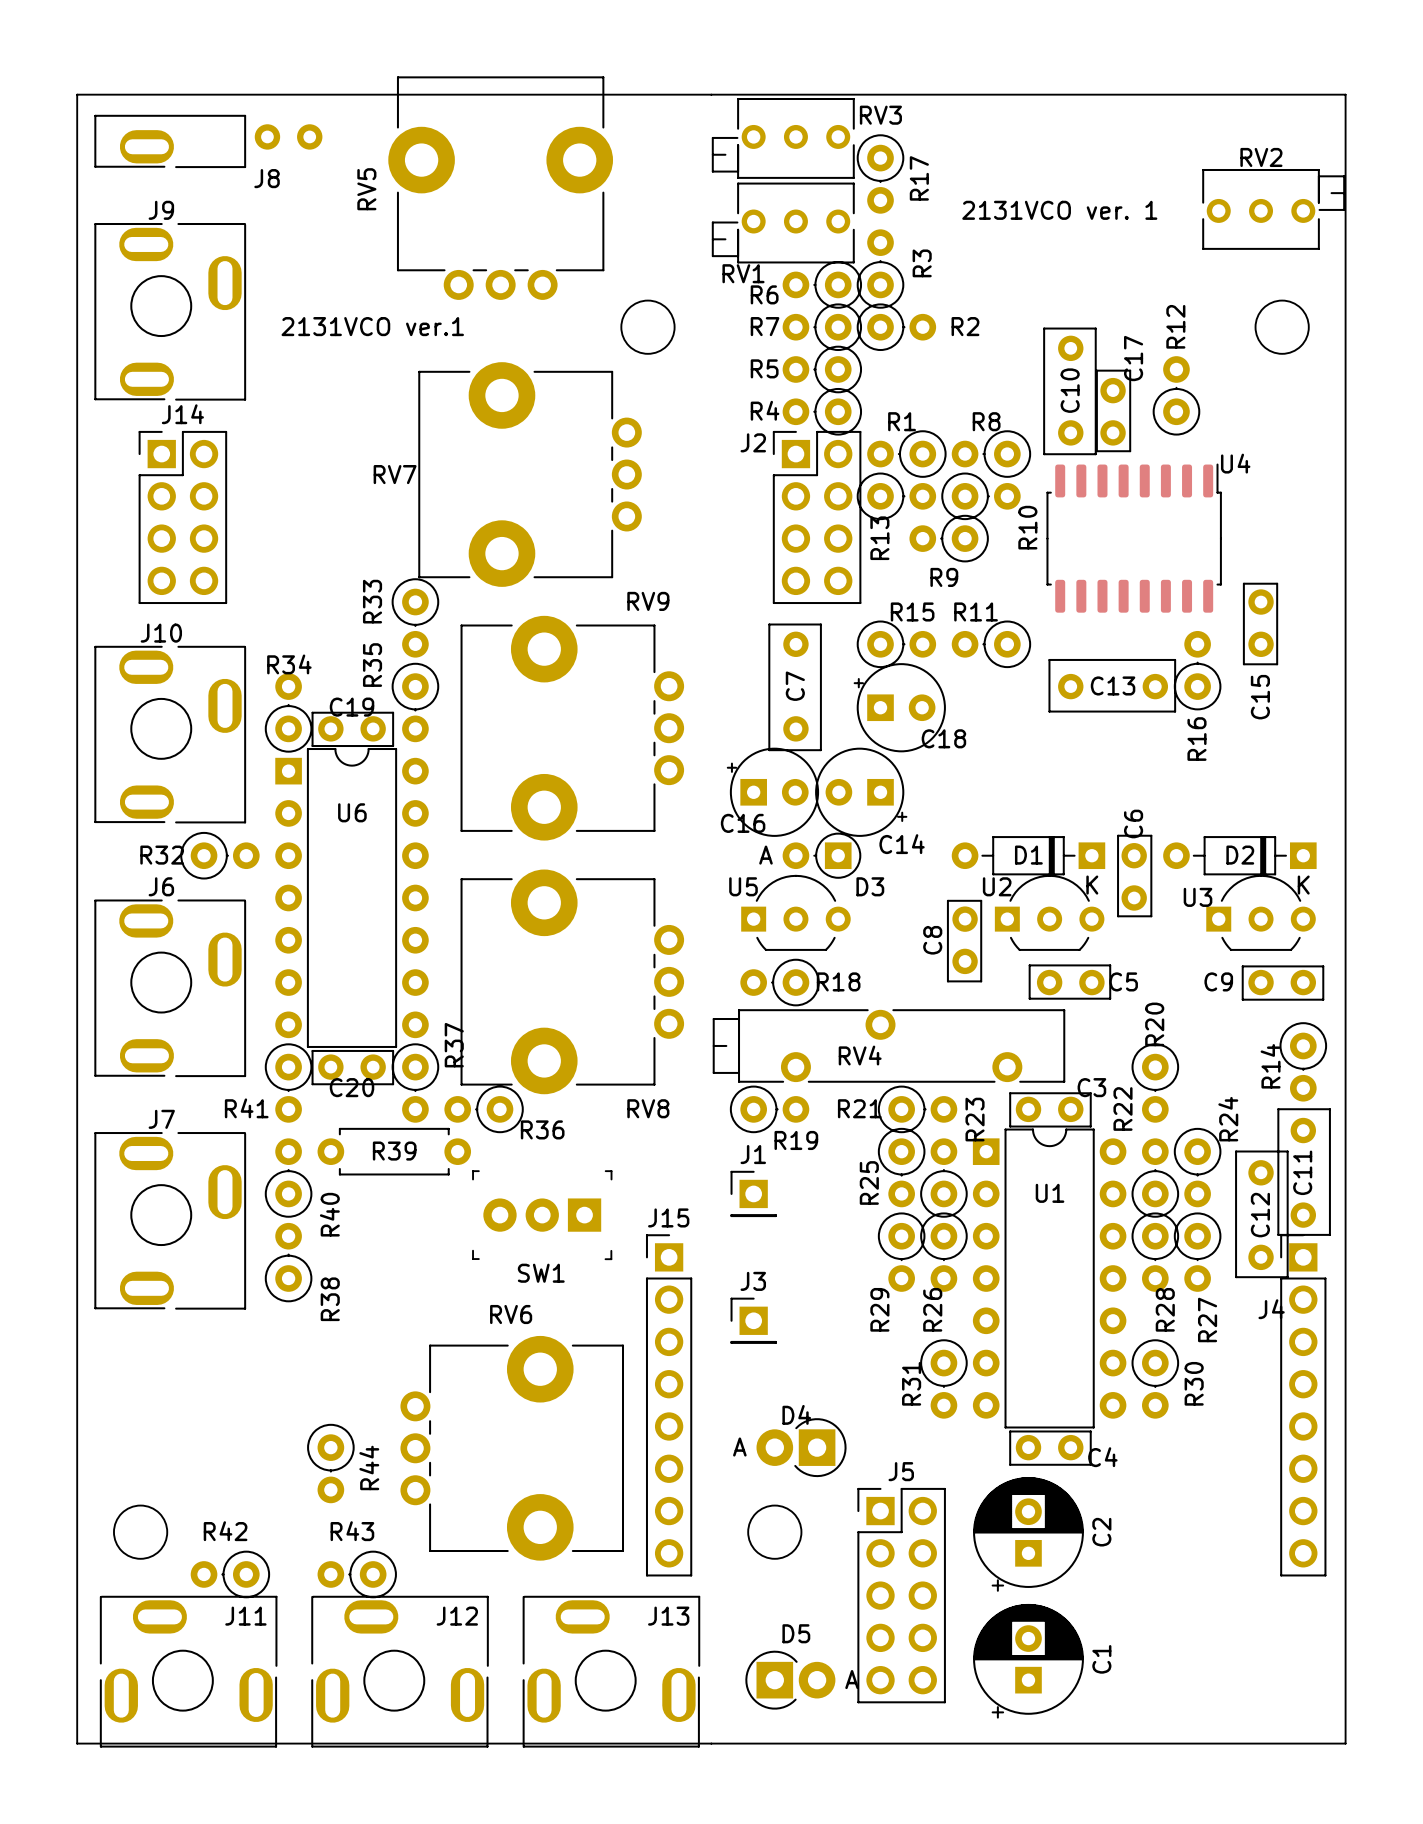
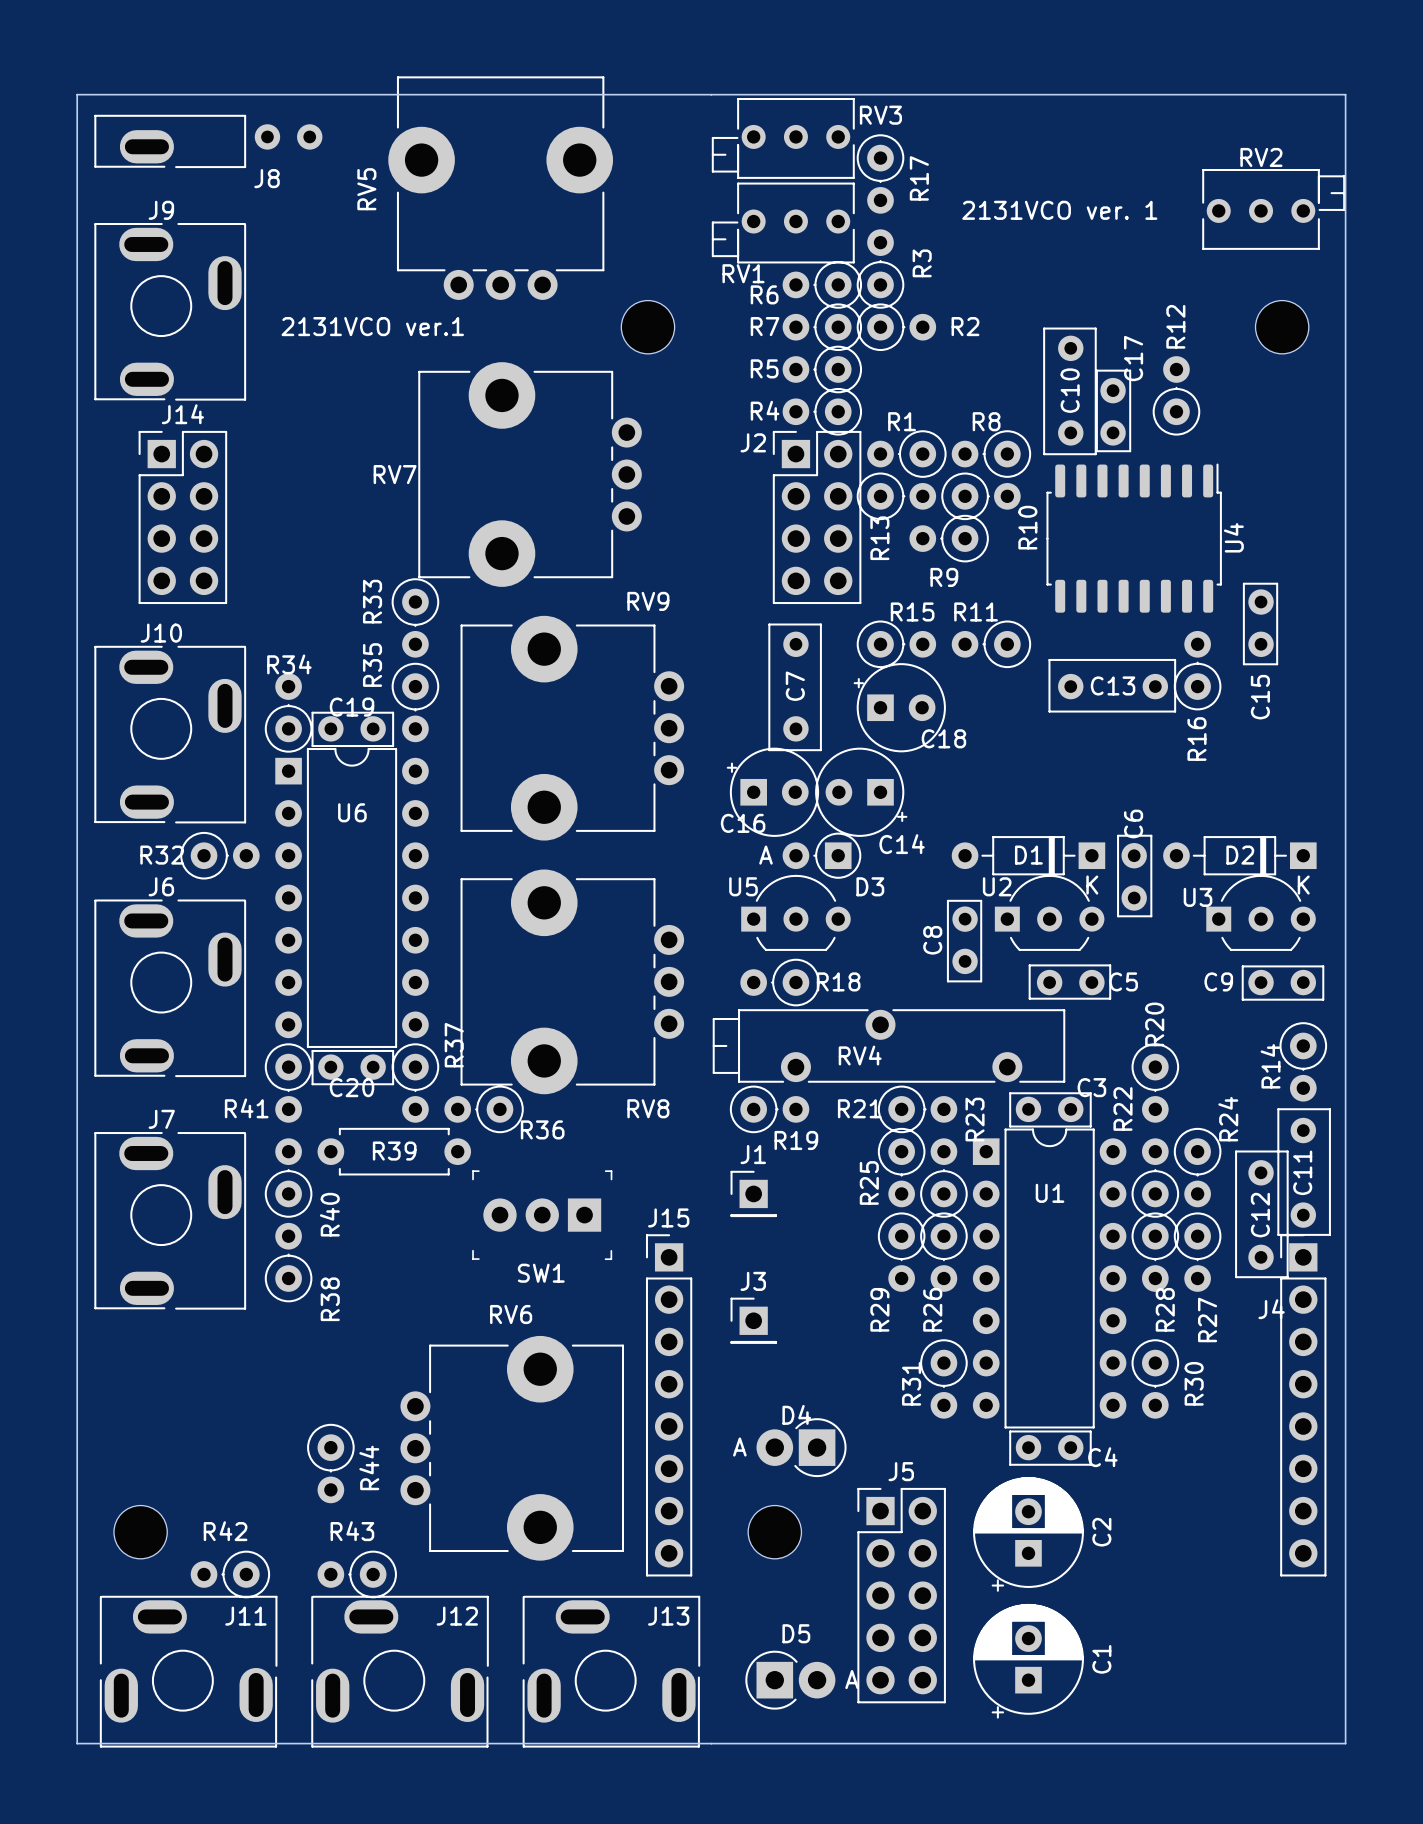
U4 name rotation: 0° (1235, 463) -> 90° counterclockwise (1233, 537)
U4 name position: U4 (1235, 463) -> U4 (1233, 537)

